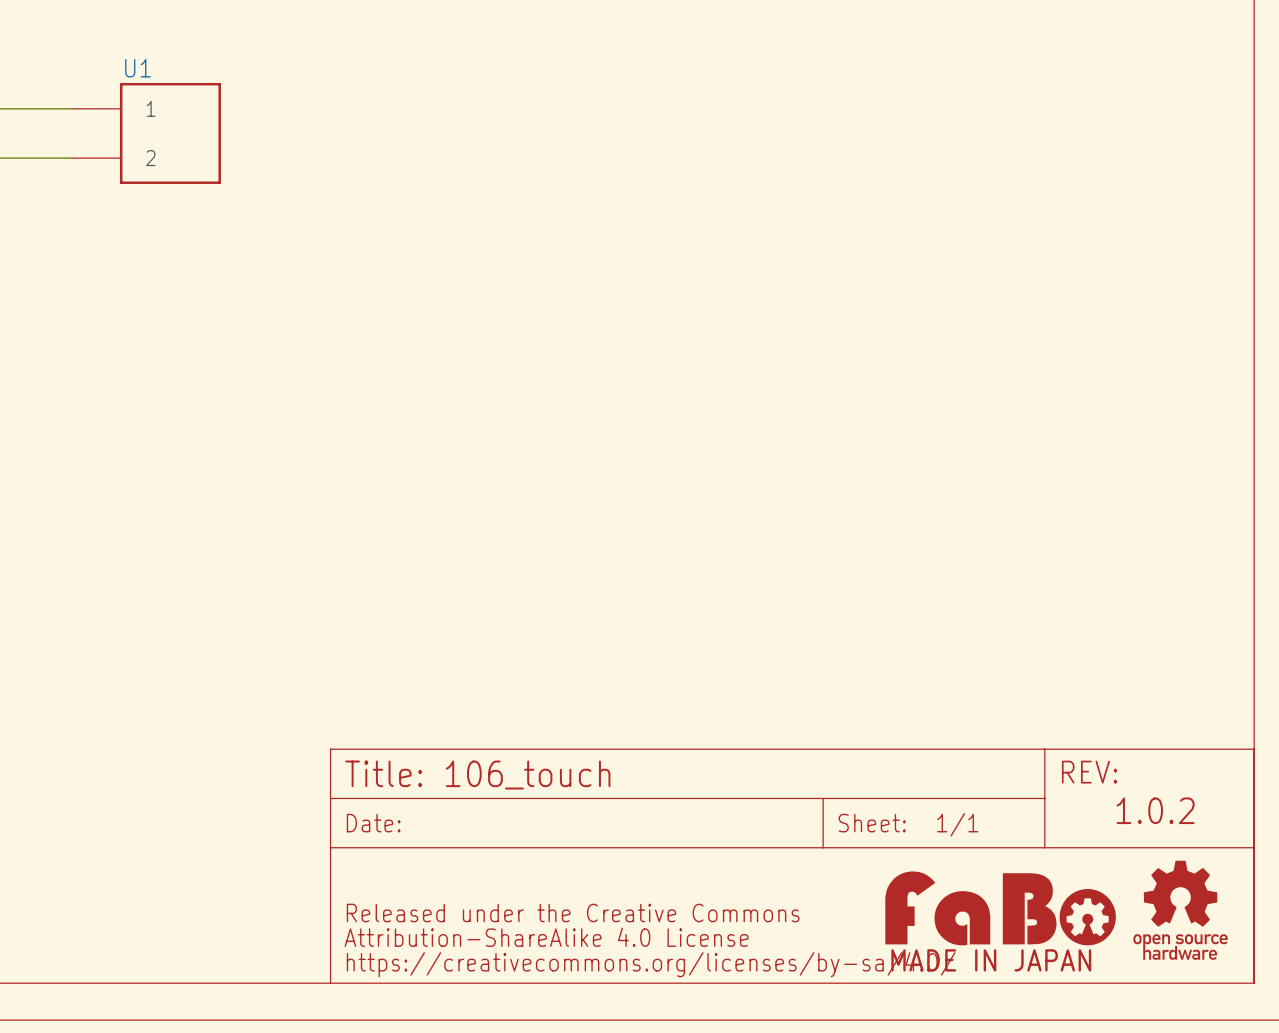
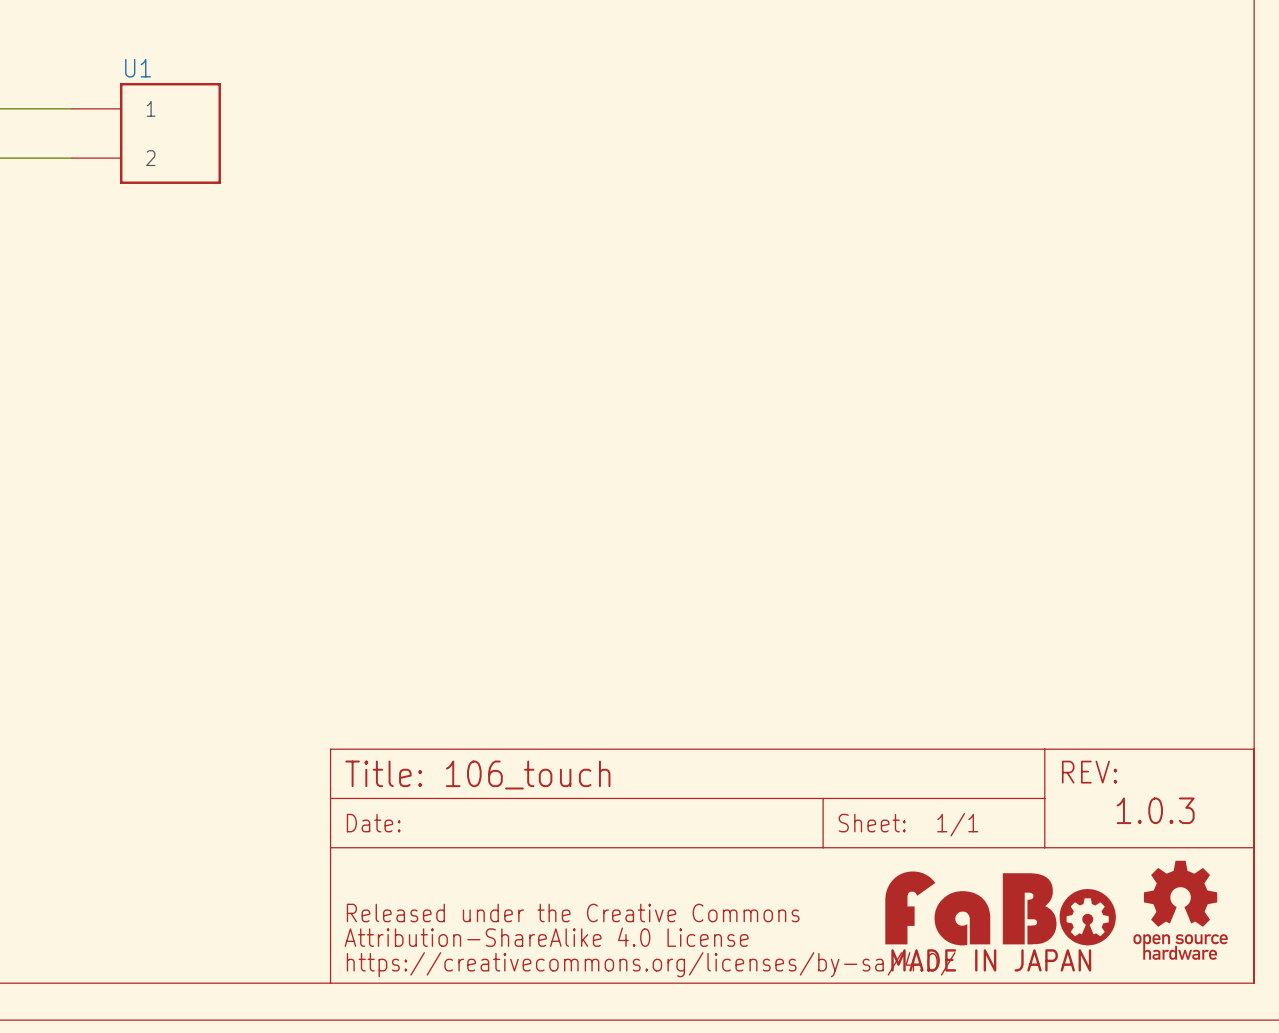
text: 1.0.2 (1155, 810) -> 1.0.3 (1155, 810)

